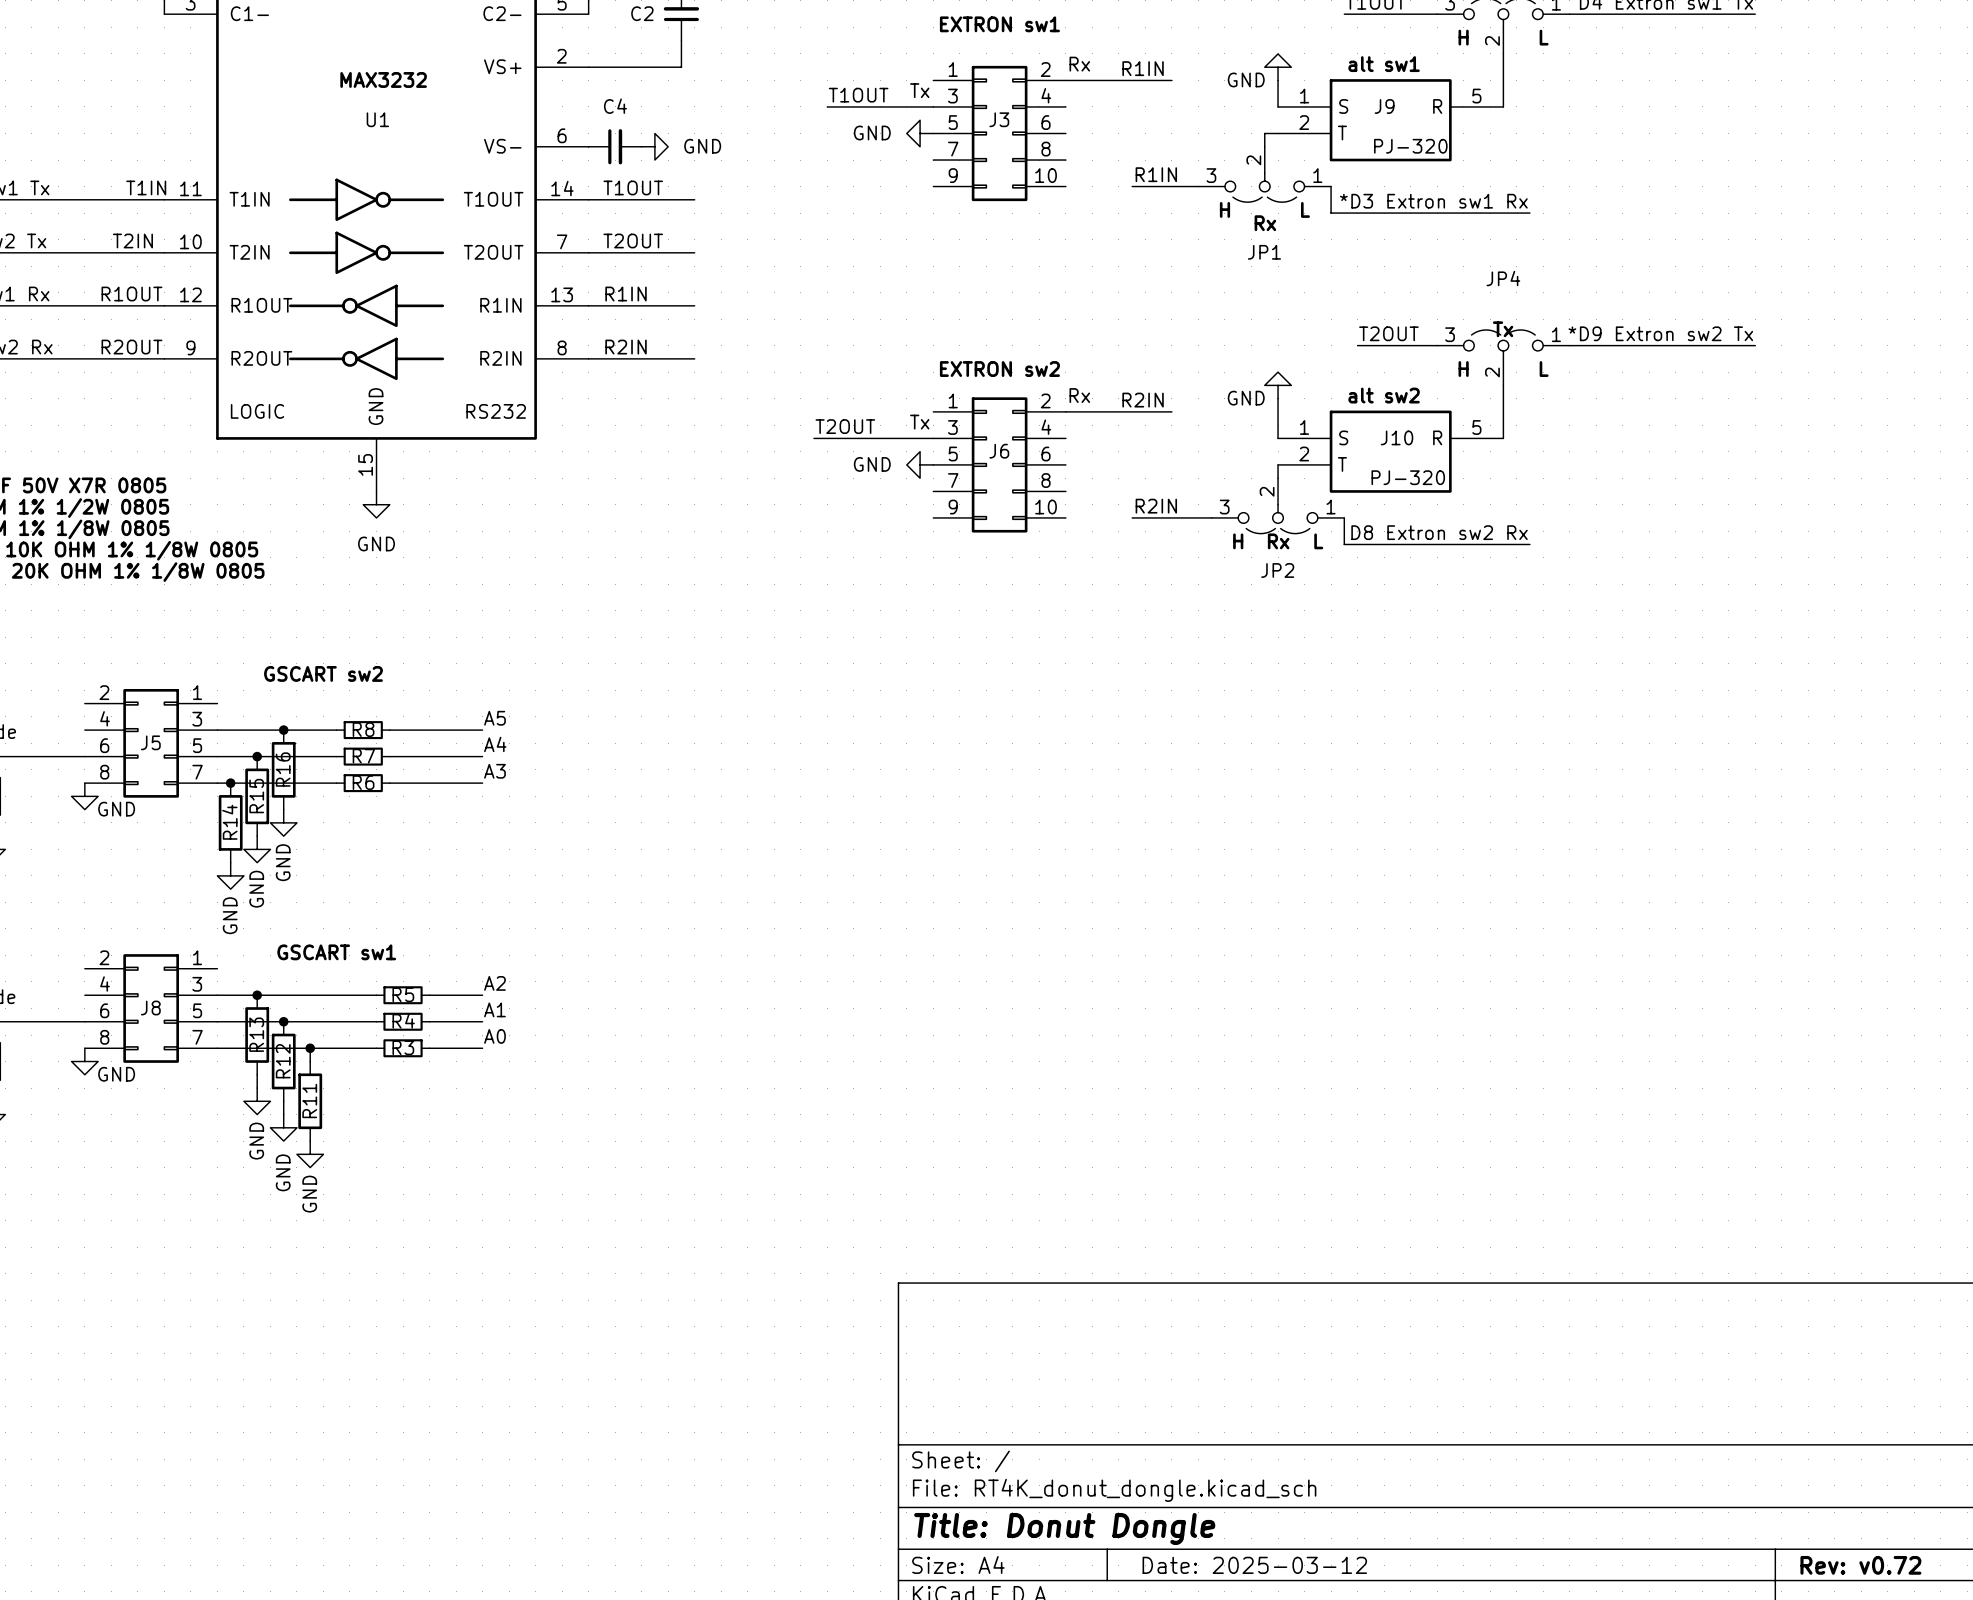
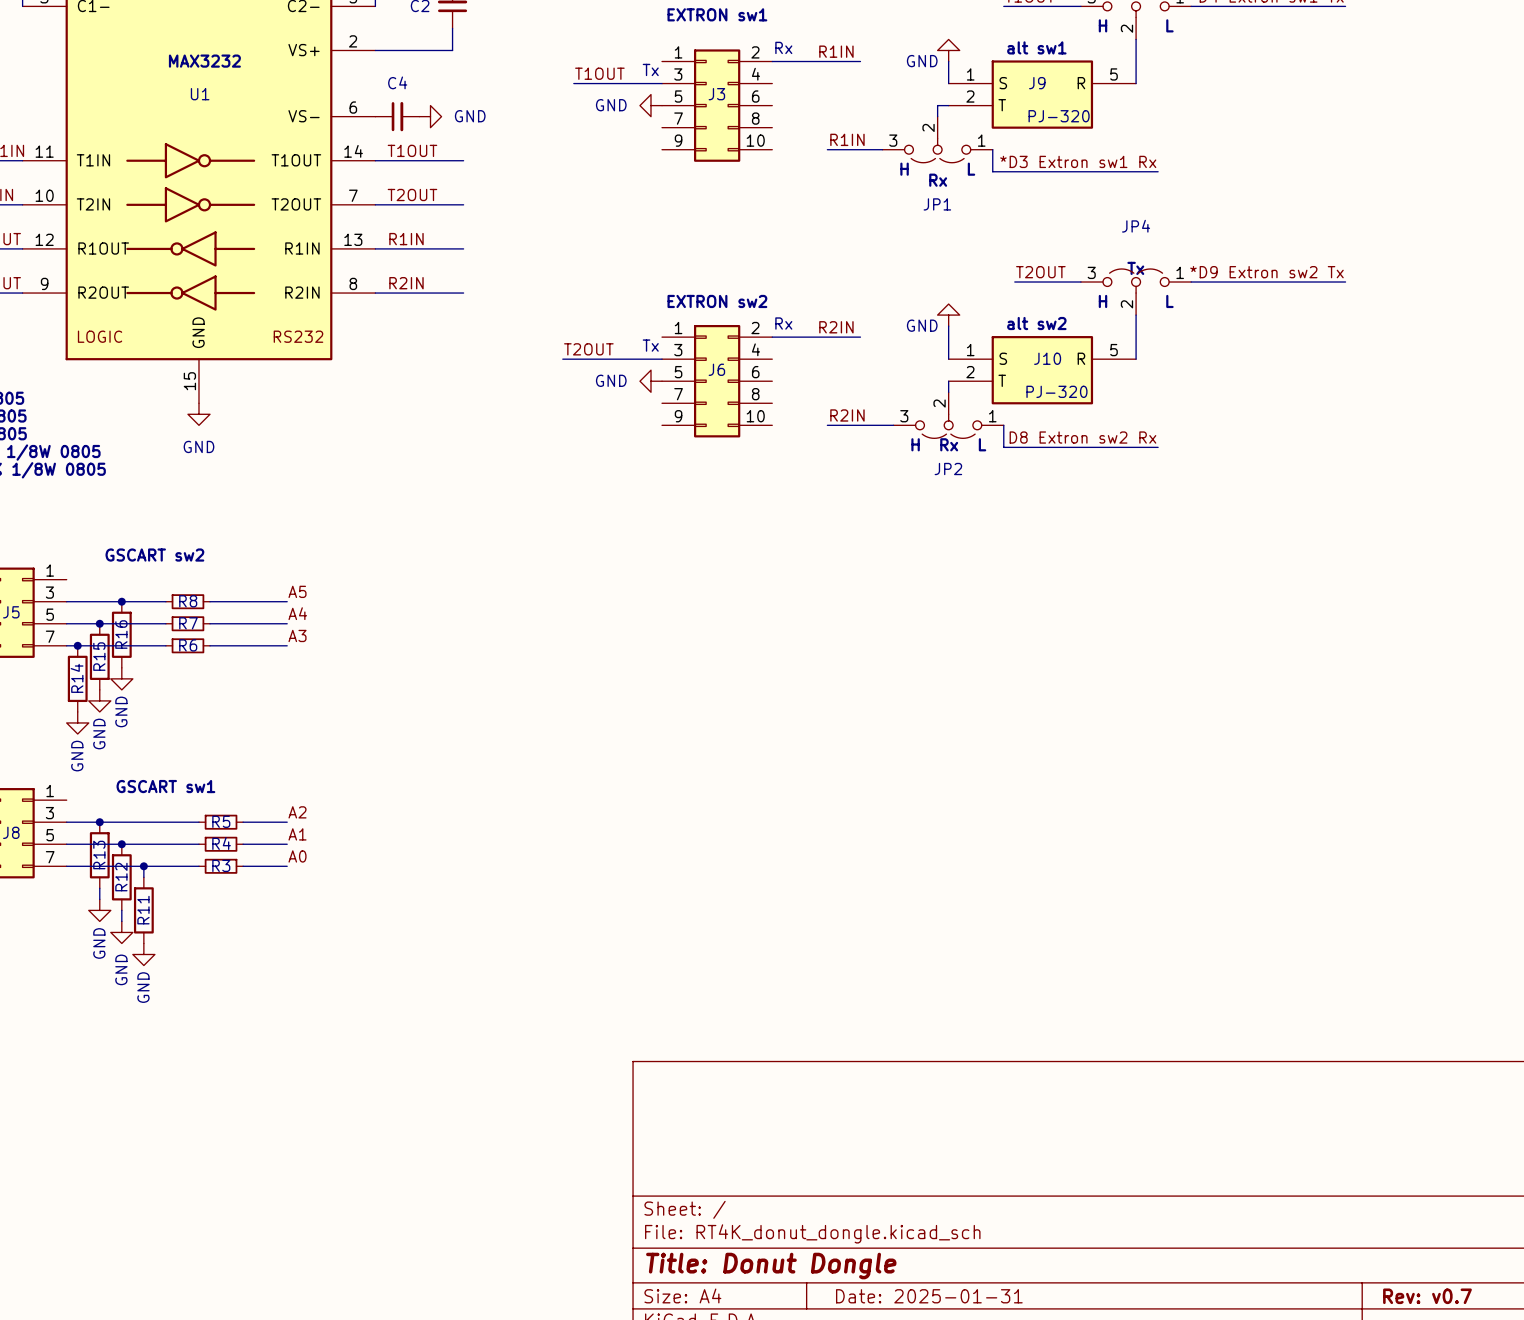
title block: Date: 2025-03-12 (1254, 1565) -> Date: 2025-01-31 (929, 1296)
title block: Rev: v0.72 (1860, 1565) -> Rev: v0.7 (1427, 1296)

